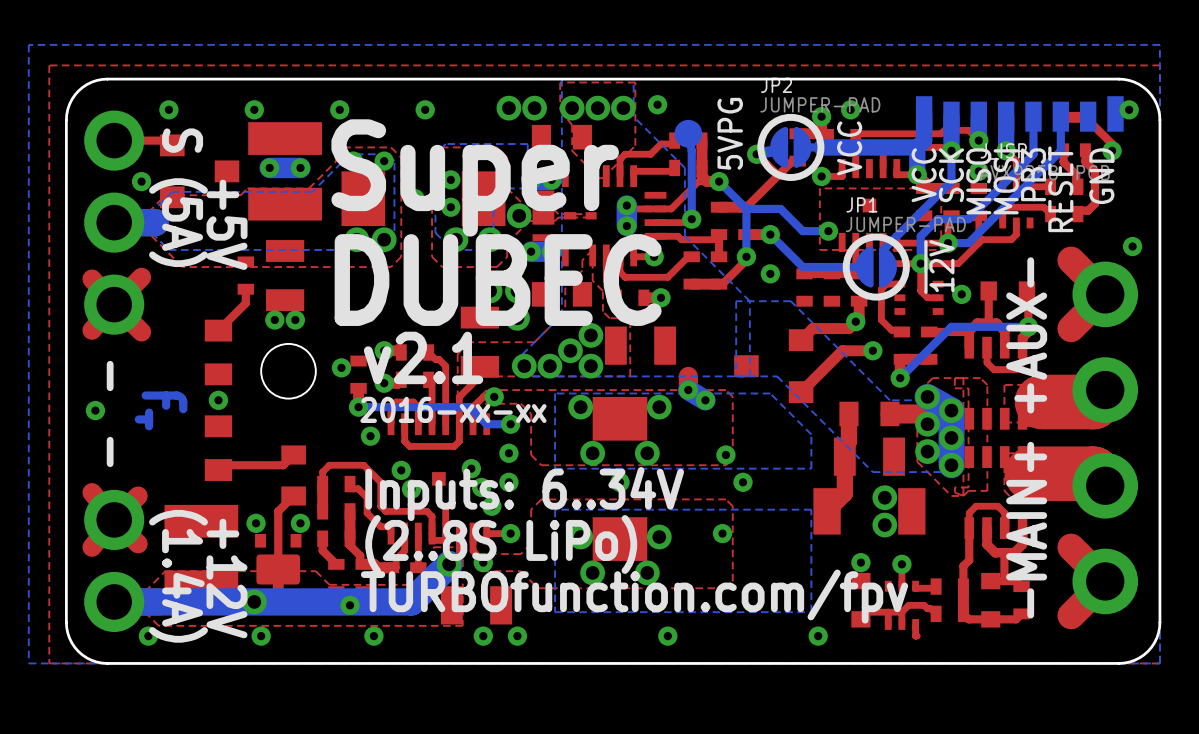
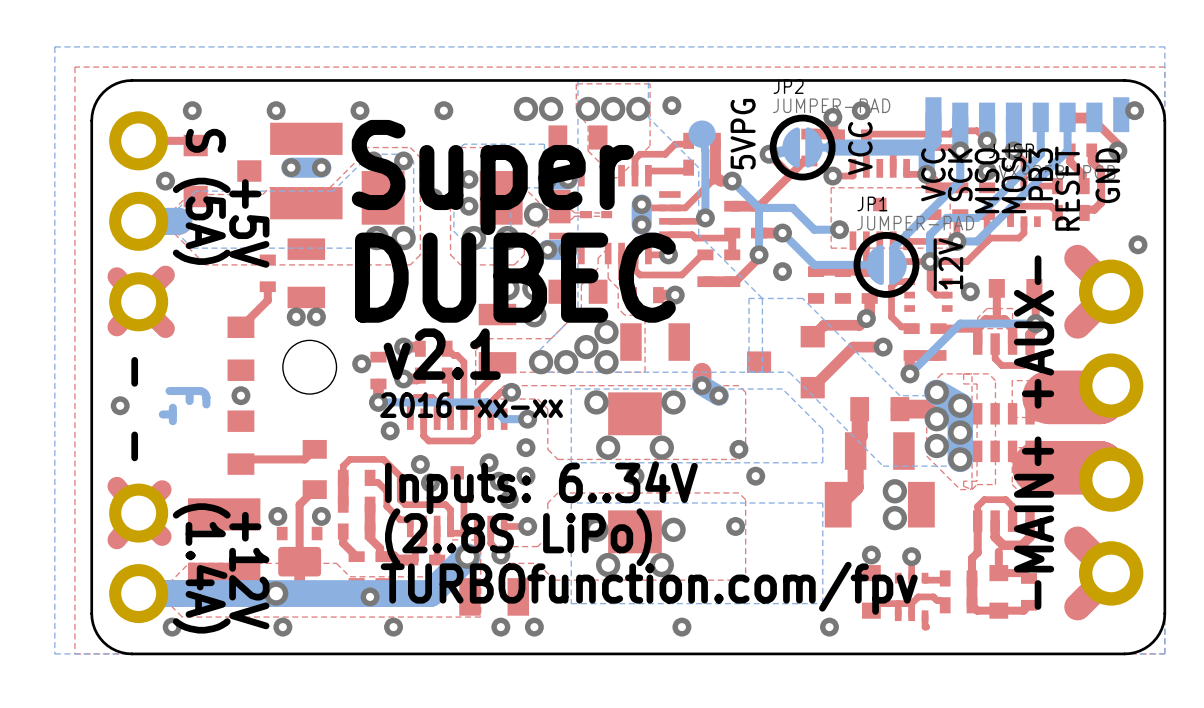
top zone outline: none -> (1012, 308) (1012, 328) (977, 328) (977, 317) (987, 308) (1012, 308)
top track: (1004, 552) (1004, 581) -> none
top track: none -> (998, 551) (998, 573)

